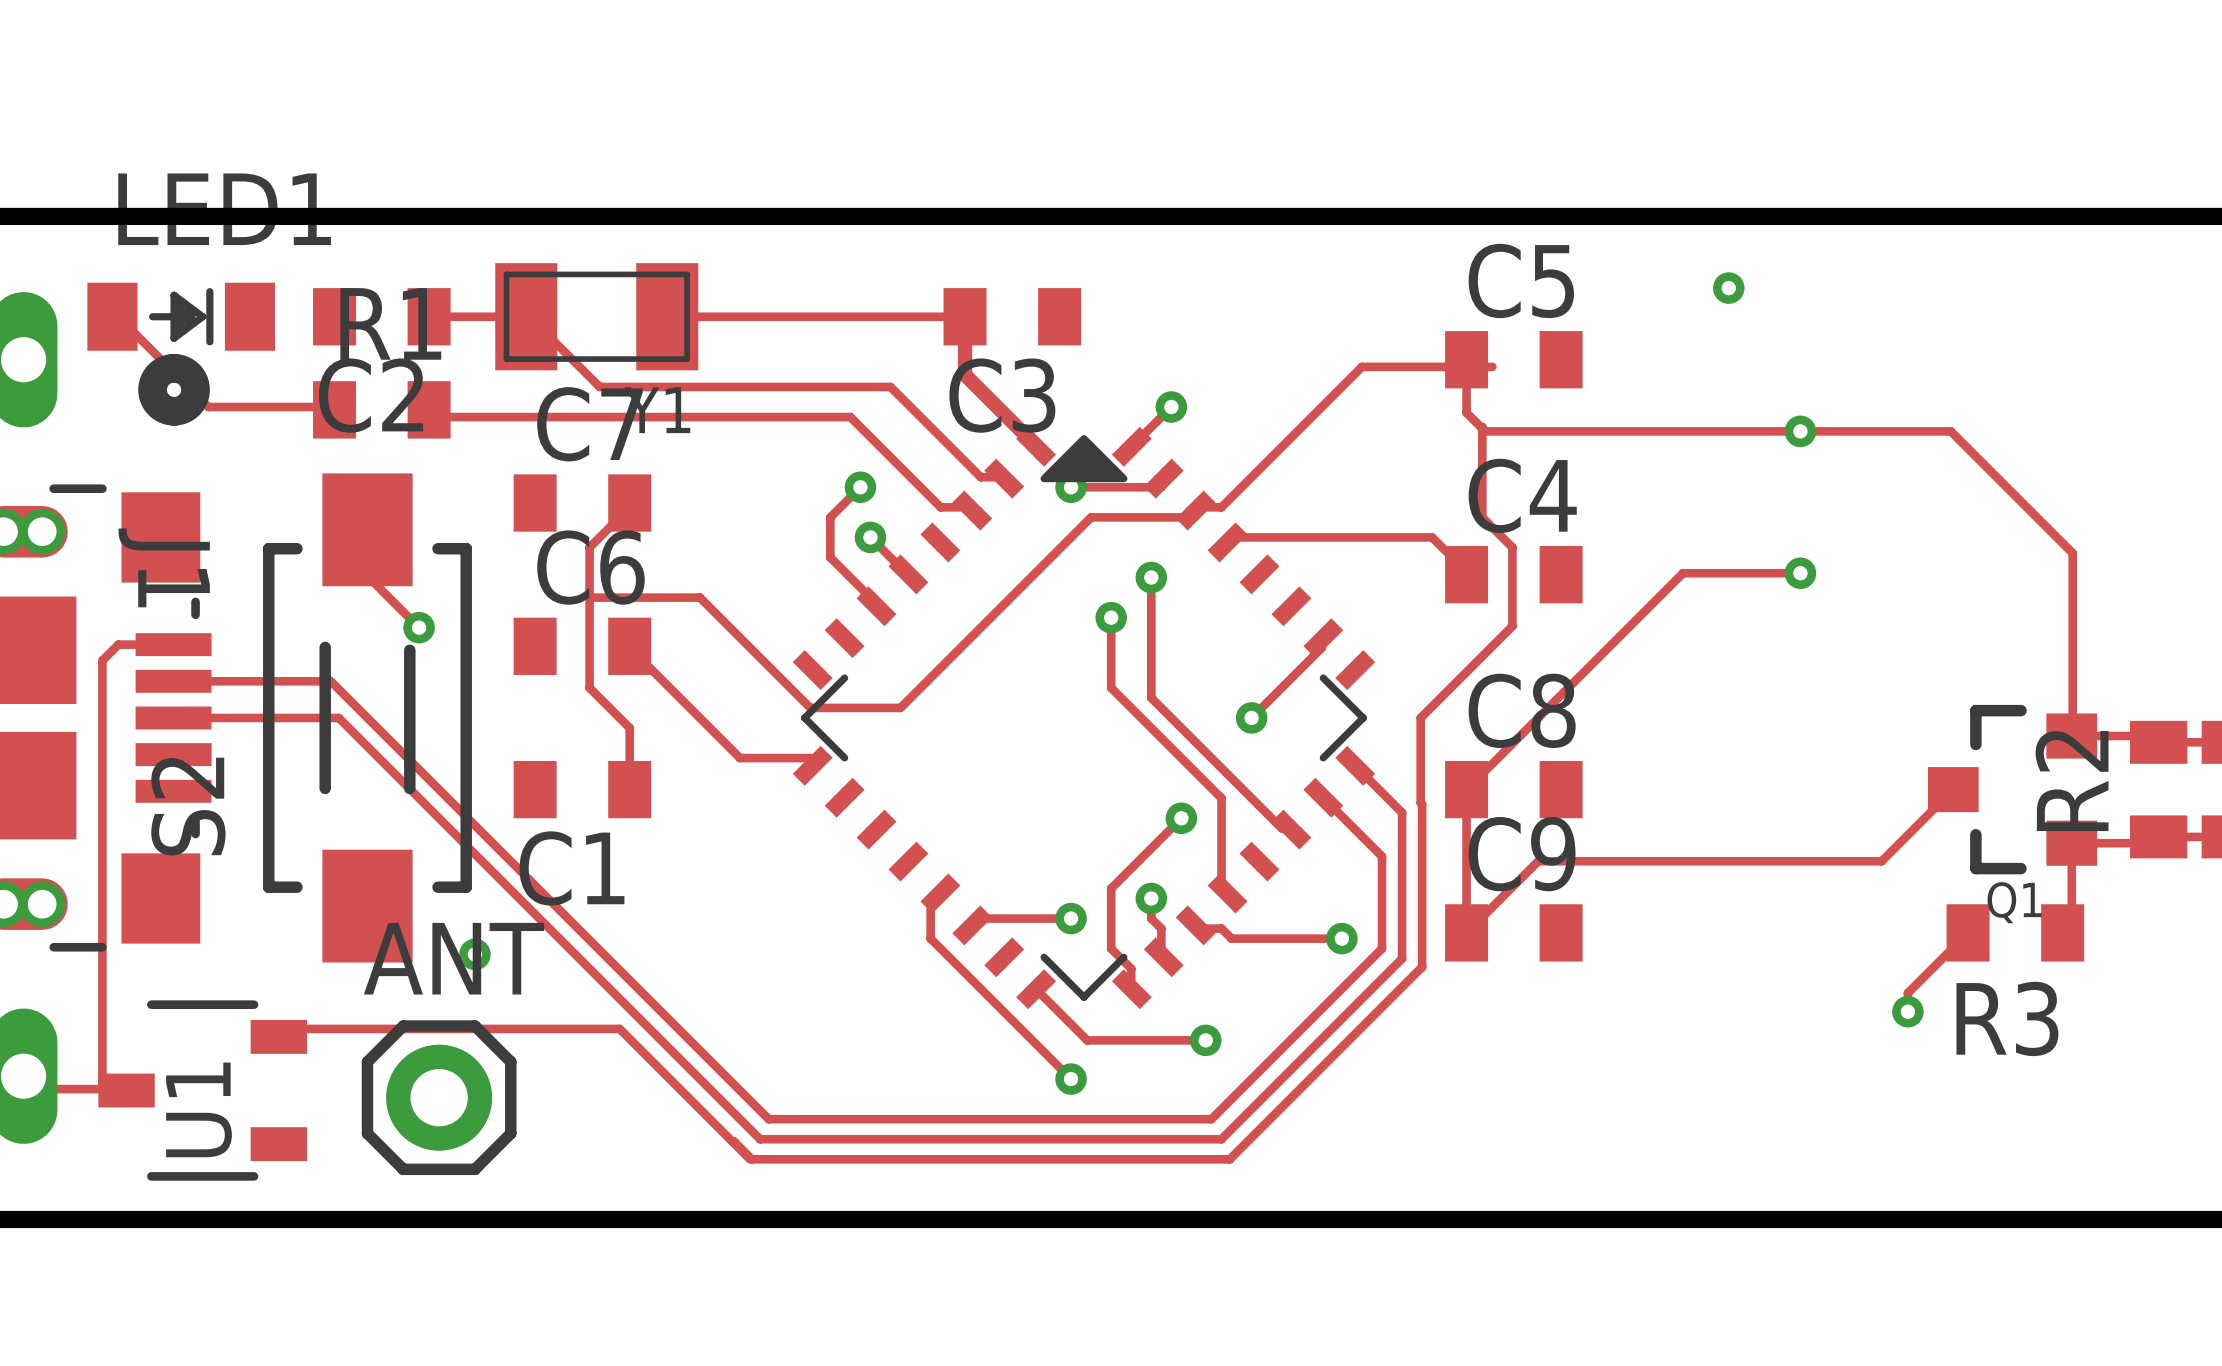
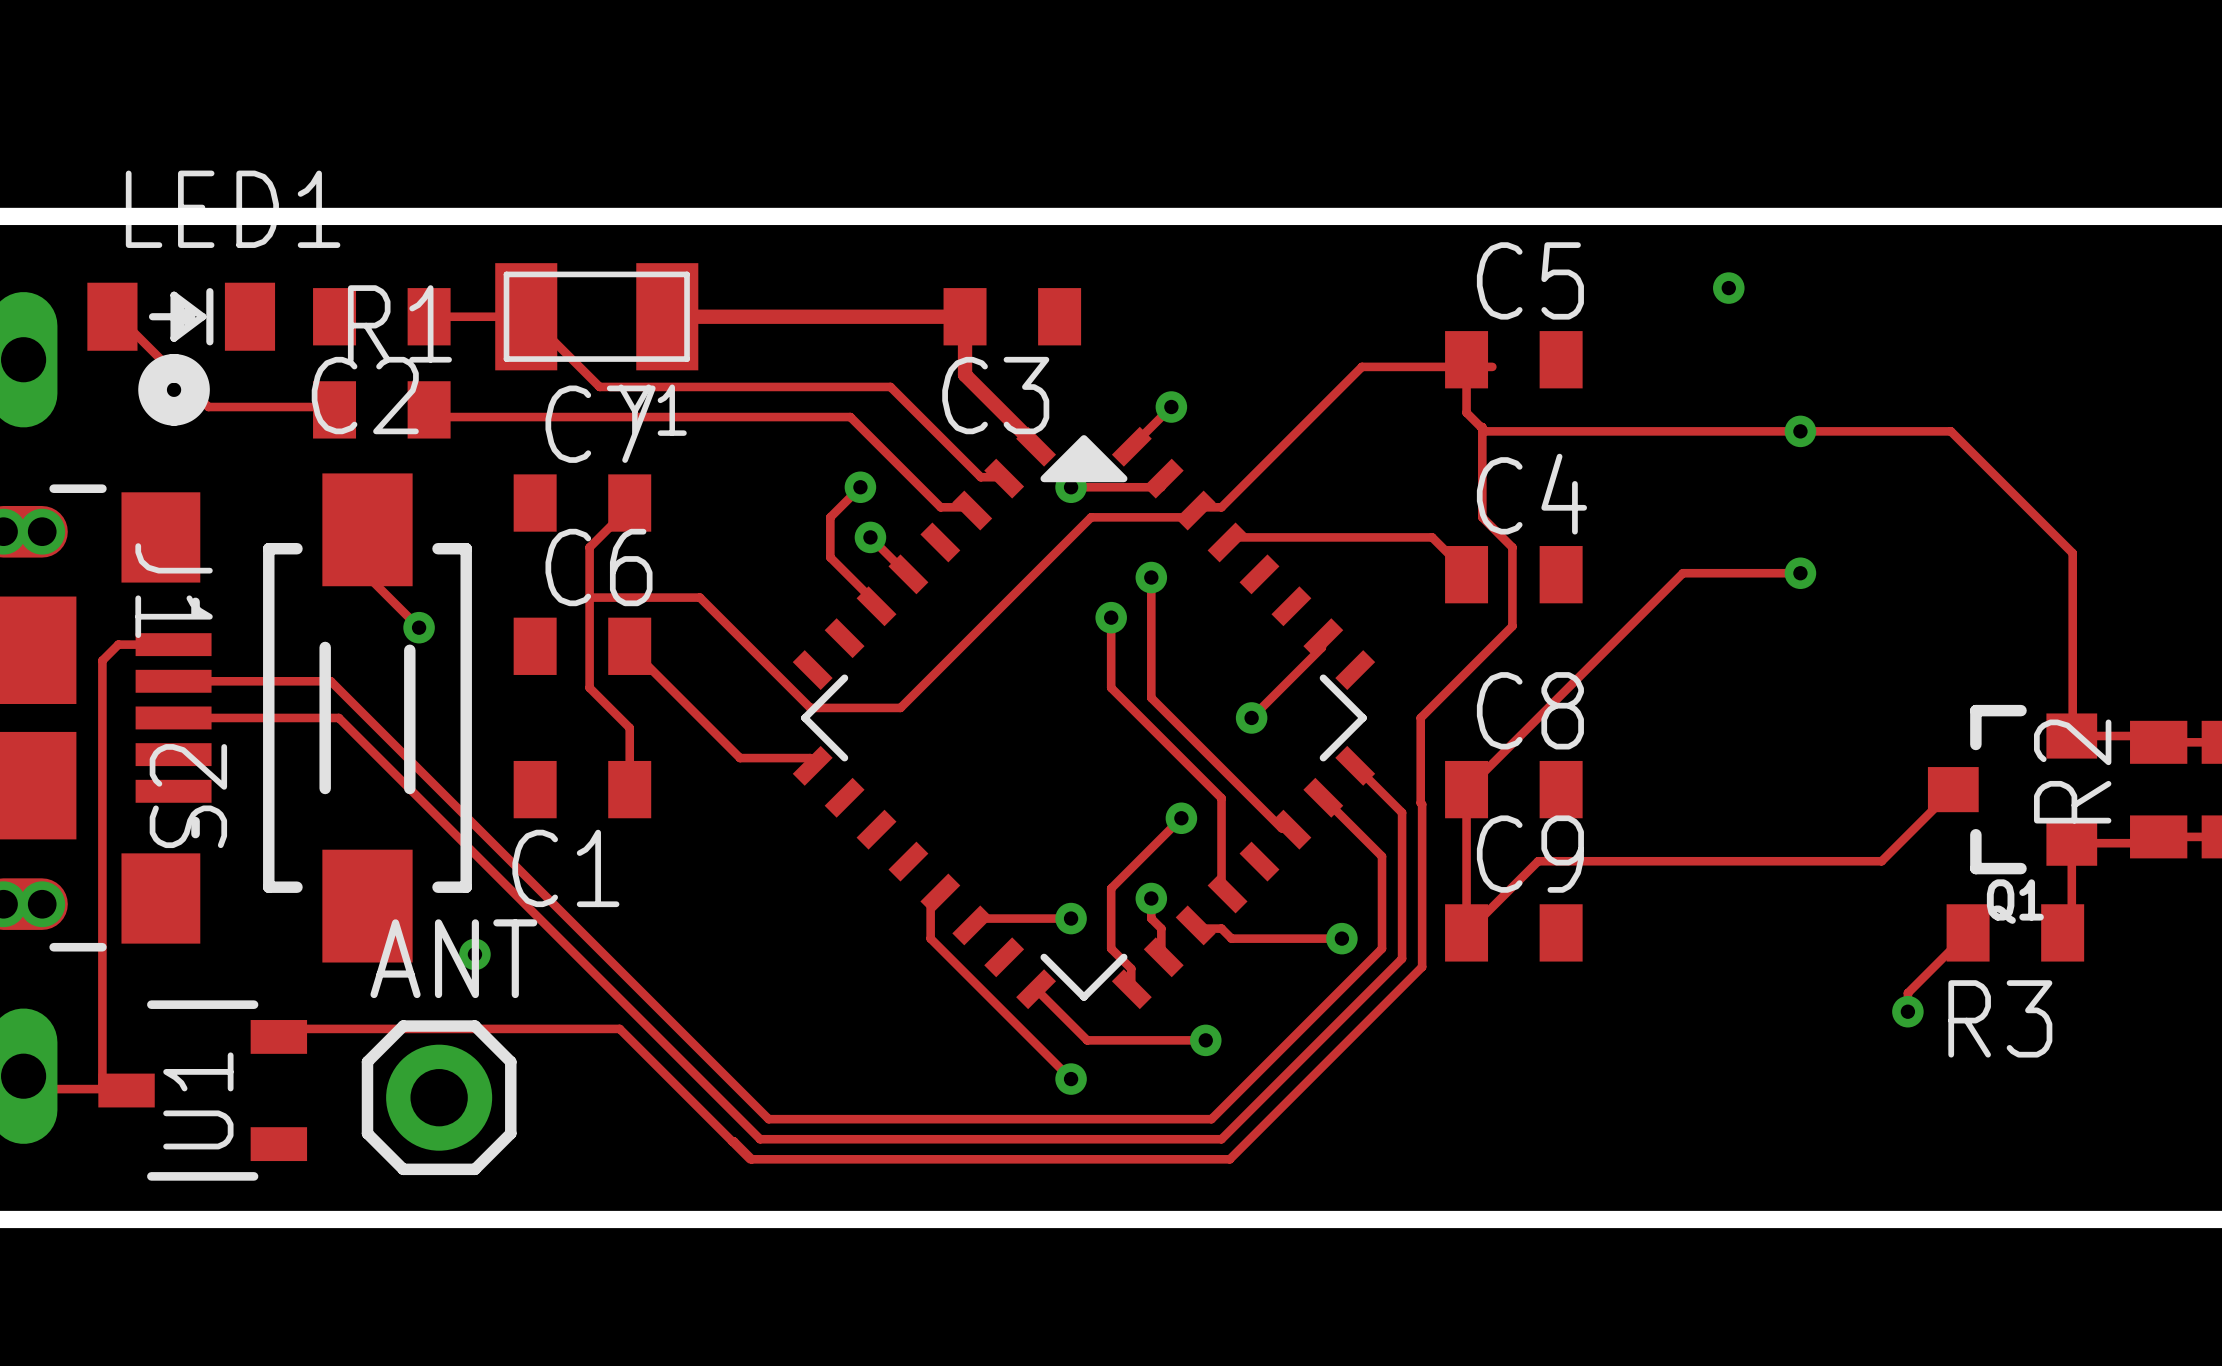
track width: thin (667, 316) (965, 316) -> thick (667, 316) (965, 316)

